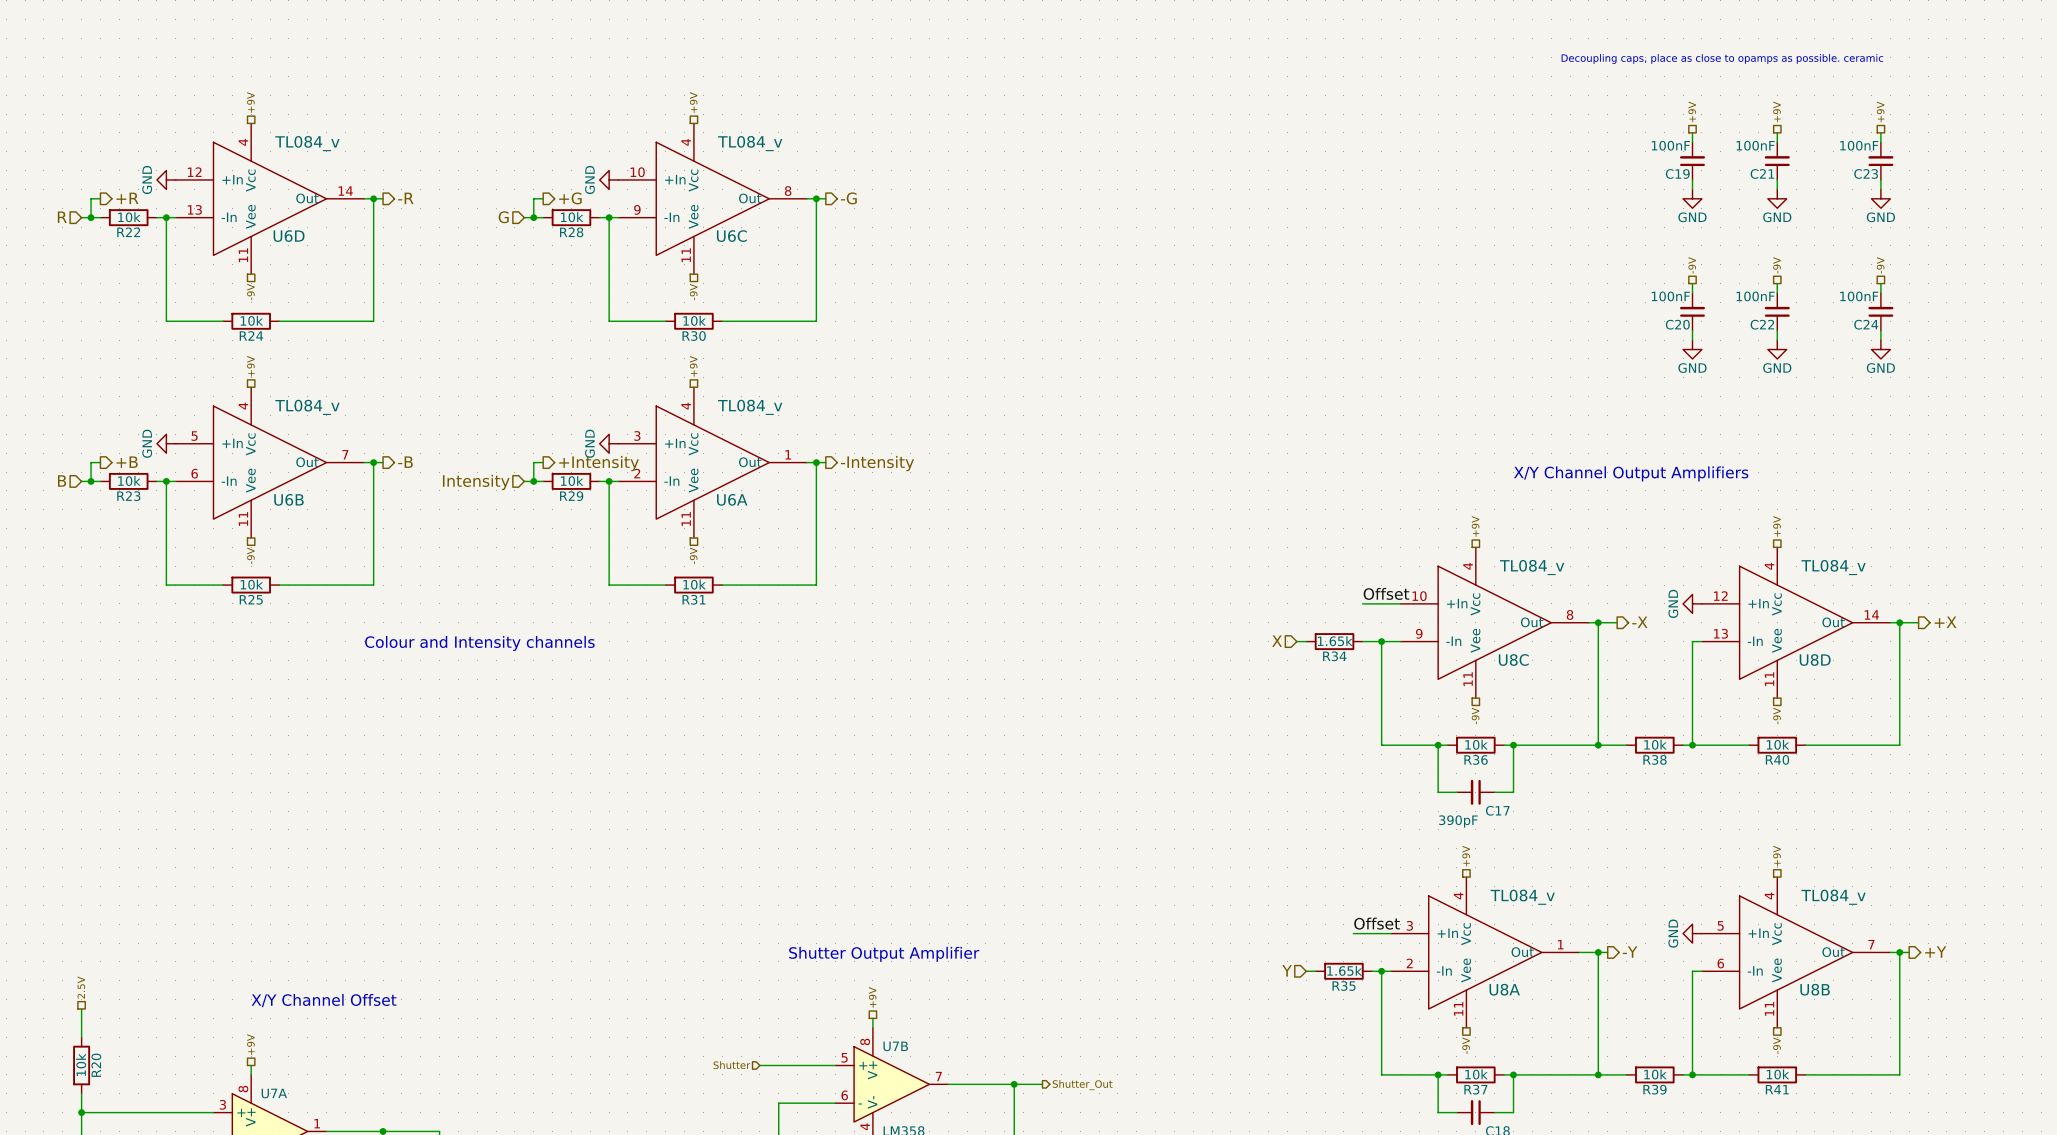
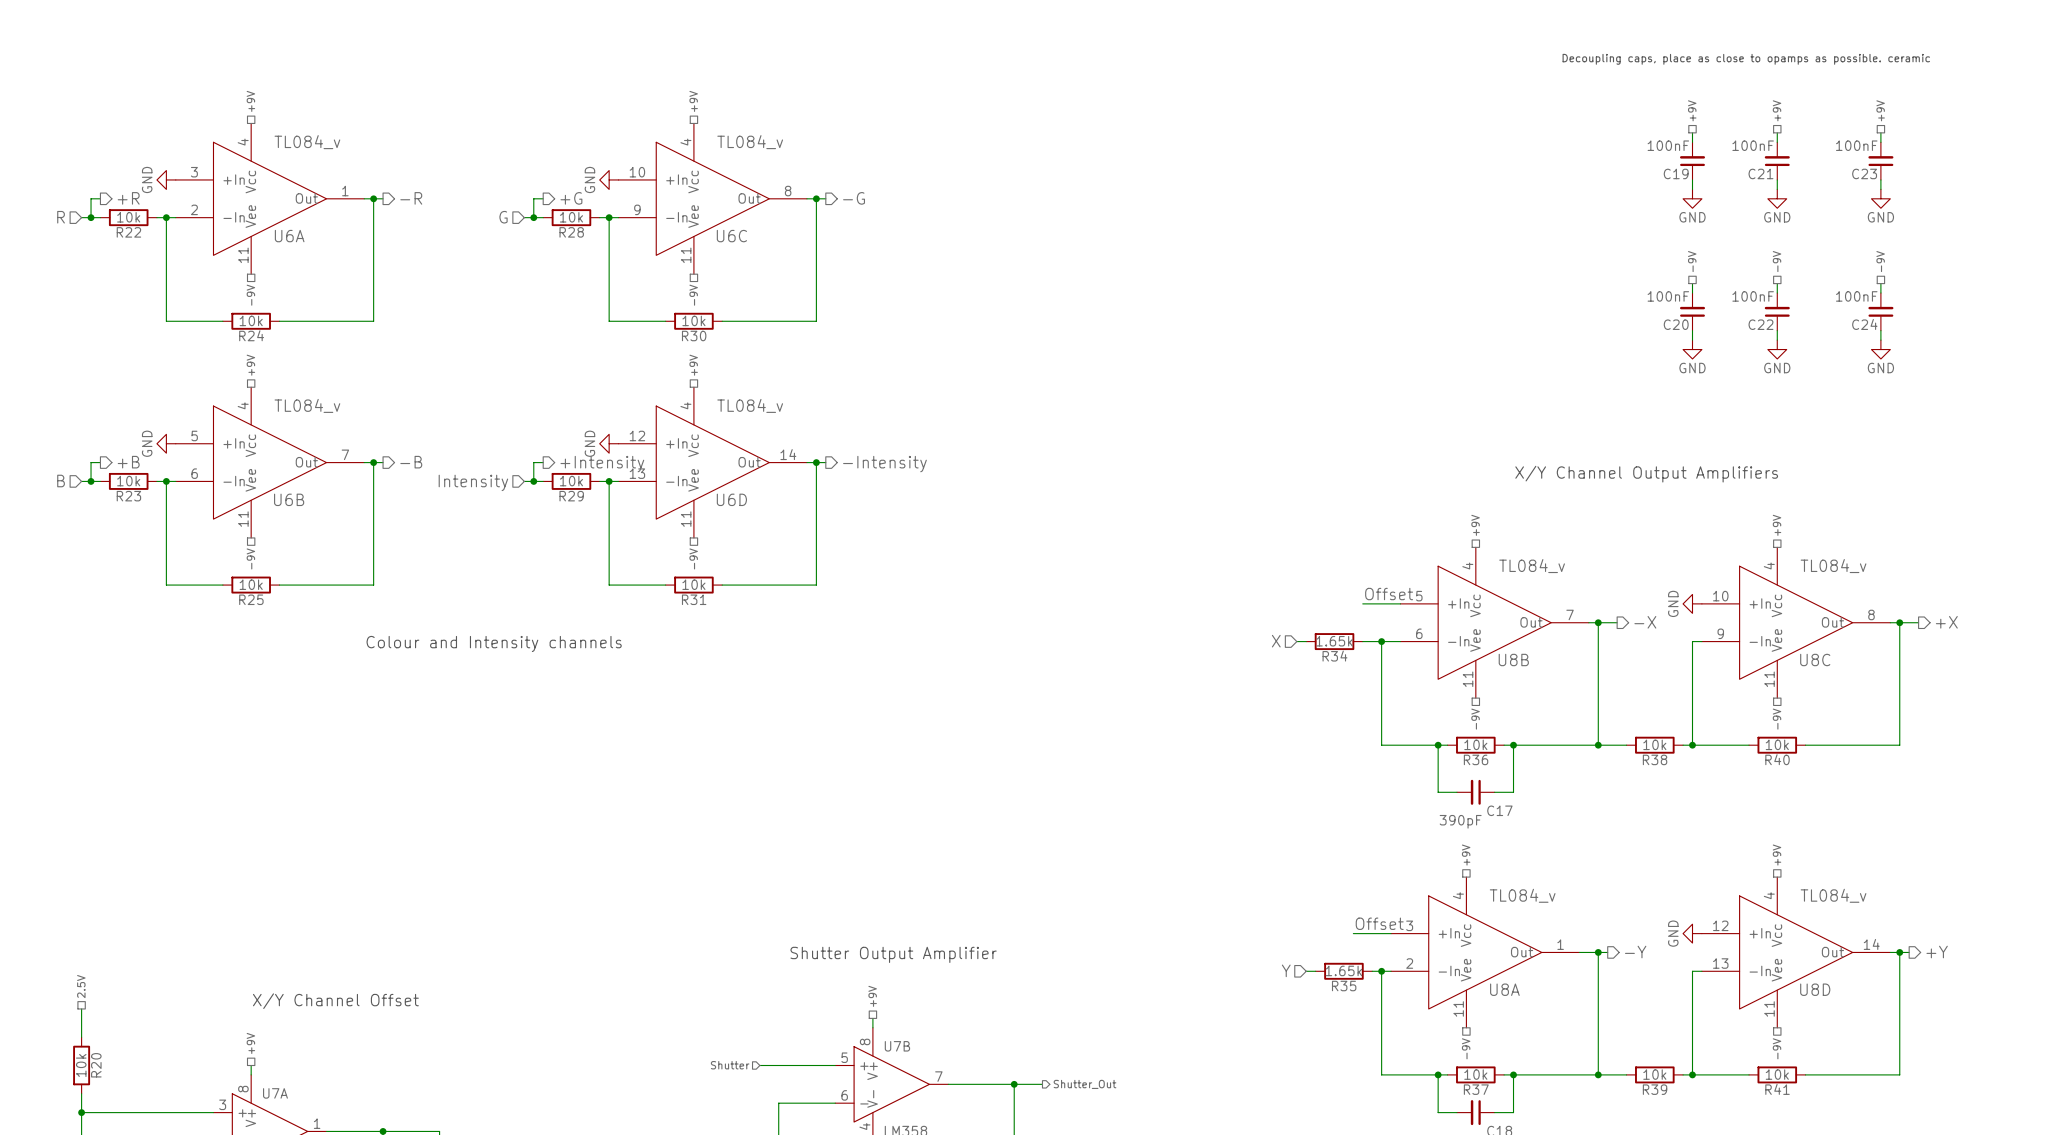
U6D position: (270, 198) -> (712, 462)
U6A position: (712, 462) -> (270, 198)
U8C position: (1494, 622) -> (1796, 622)
U8D position: (1796, 622) -> (1796, 952)
U8B position: (1796, 952) -> (1494, 622)

